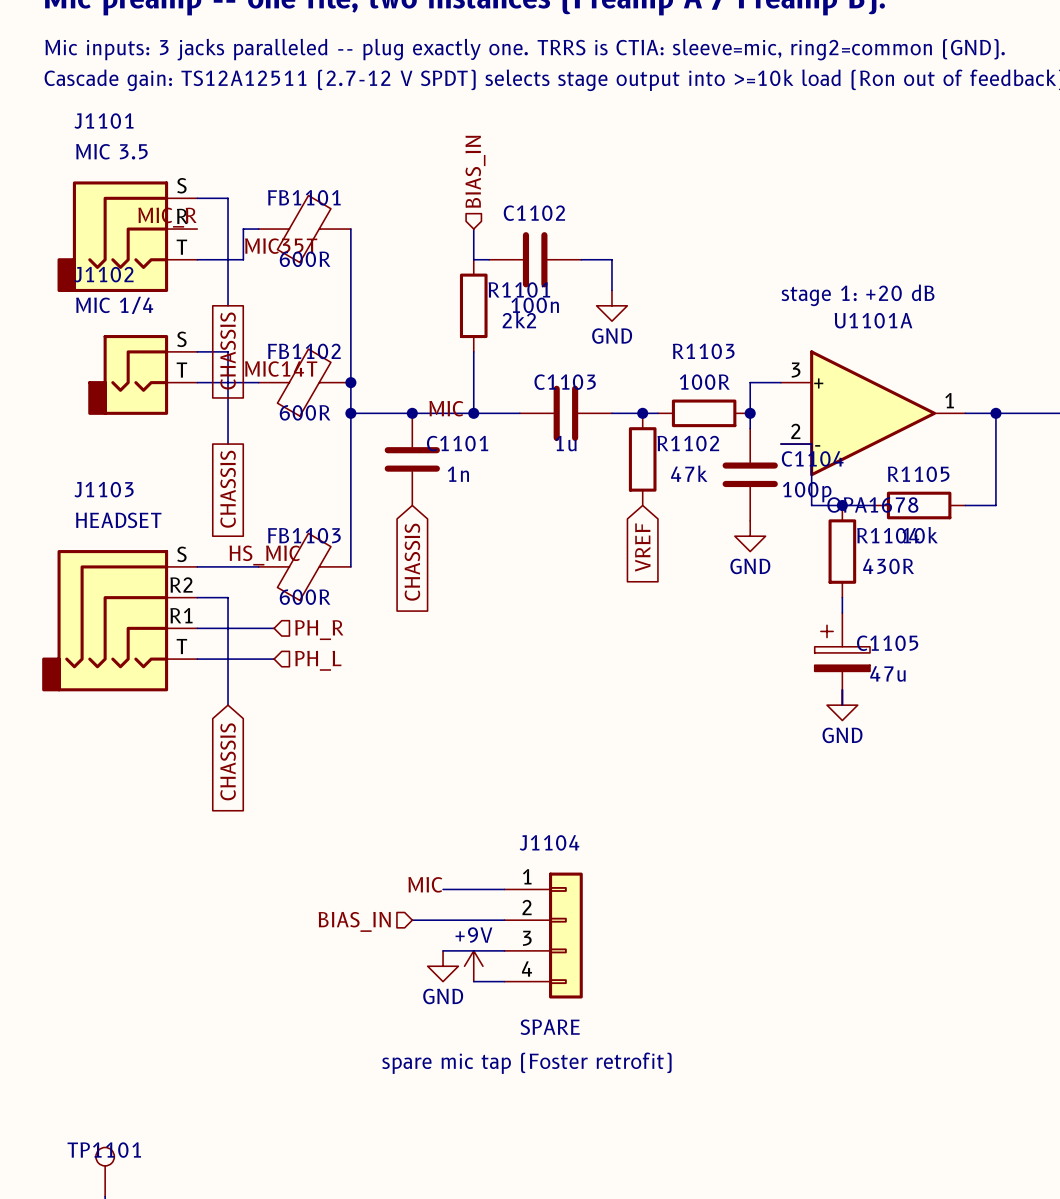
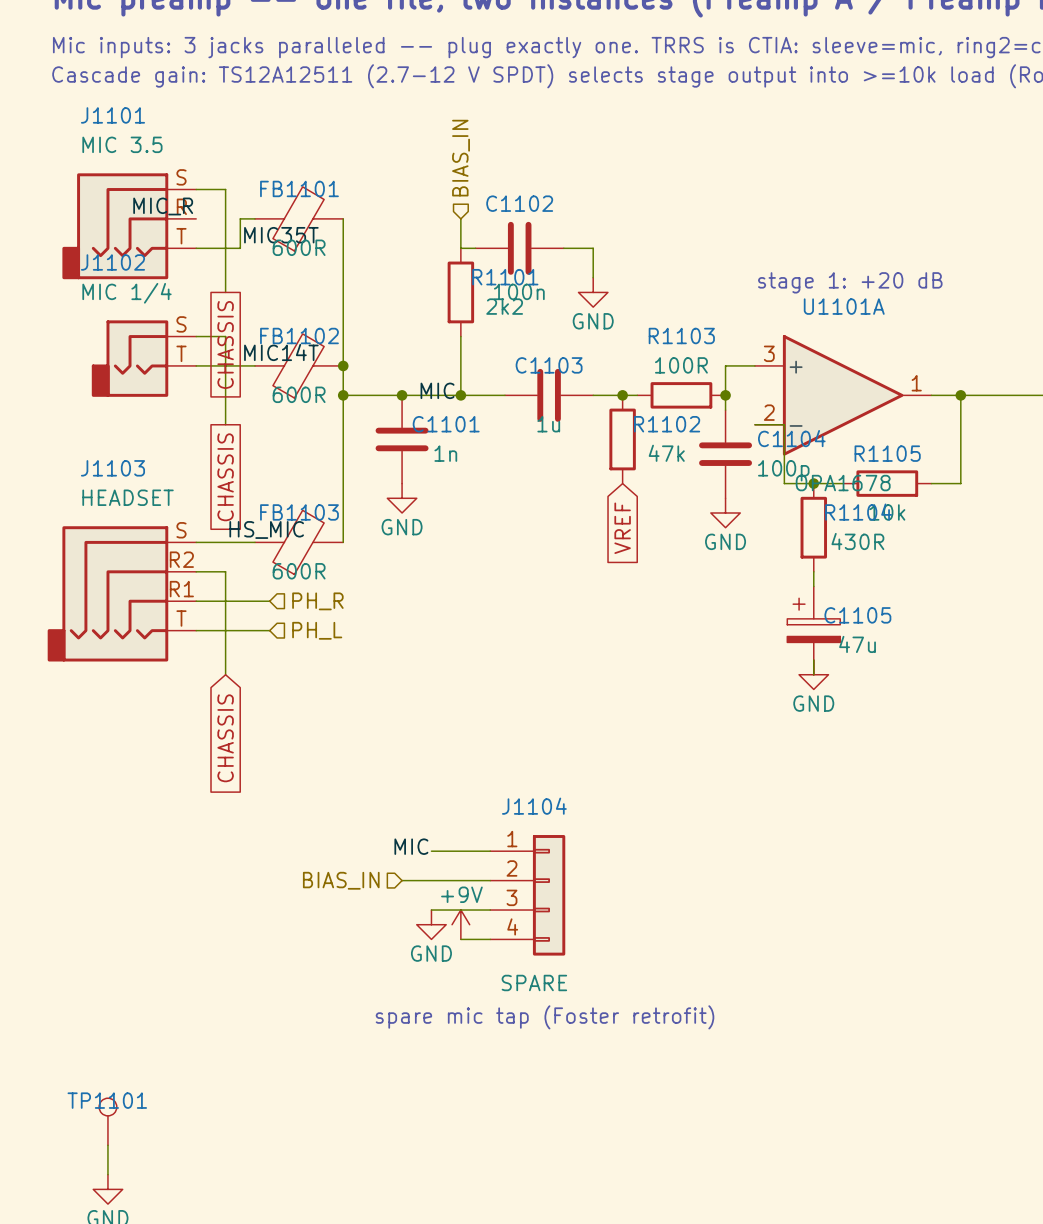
power symbol: none -> GND (402, 498)
global label: CHASSIS (412, 562) -> none

